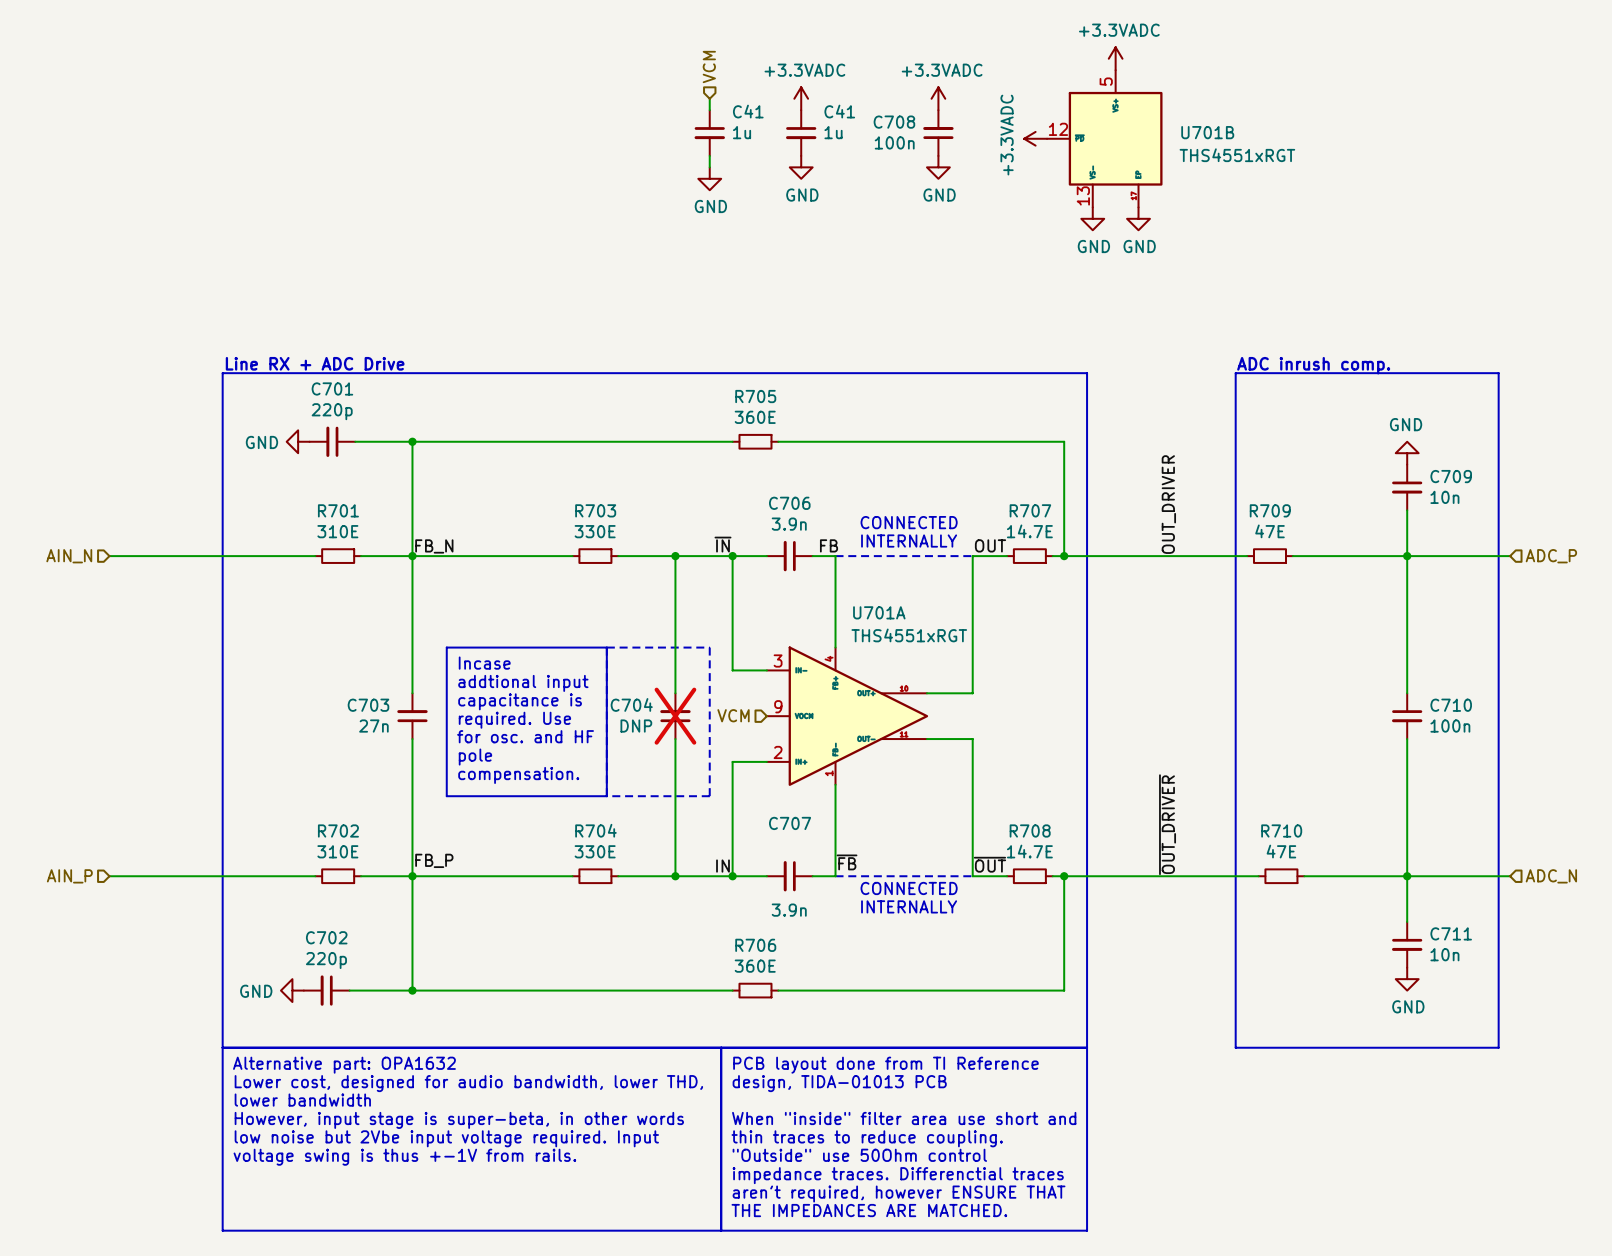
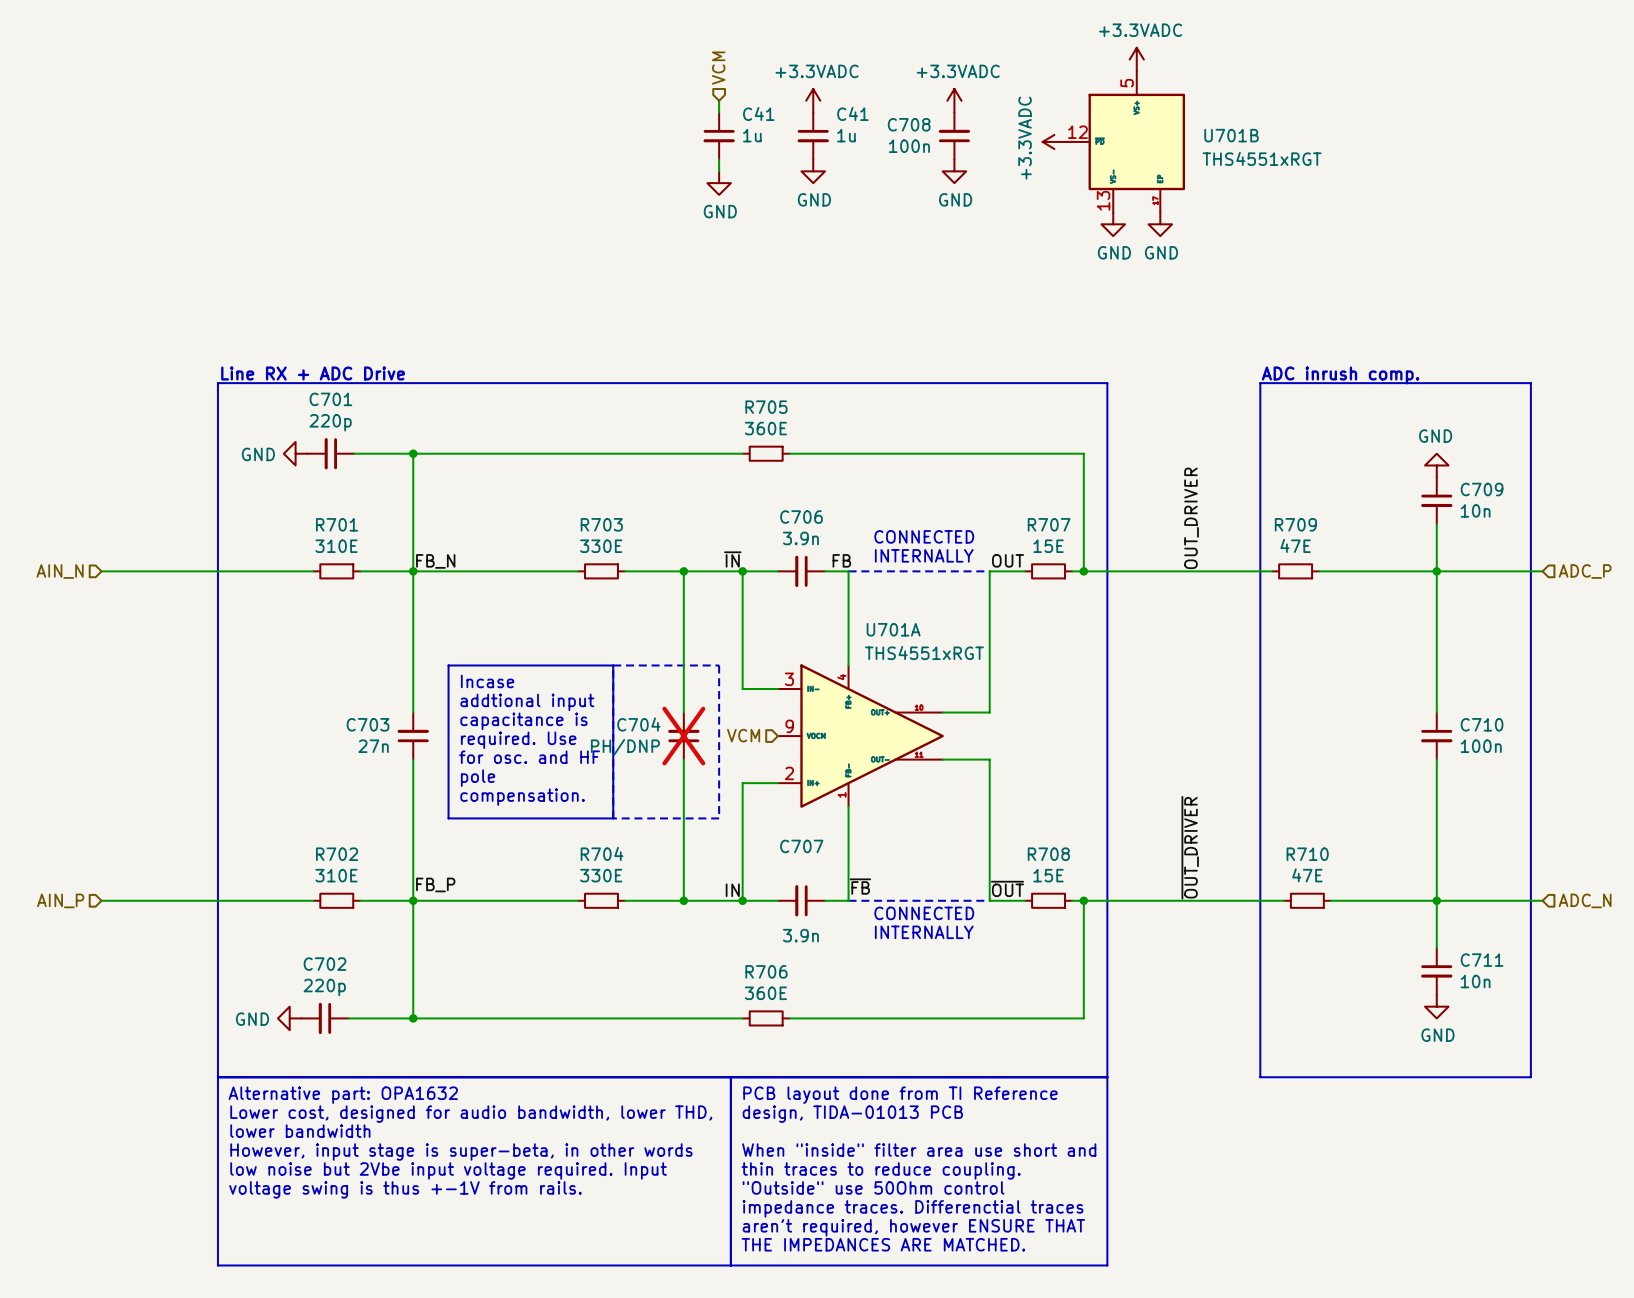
R707 value: 14.7E (1029, 531) -> 15E (1048, 546)
C704 value: DNP (636, 726) -> PH/DNP (625, 747)
R708 value: 14.7E (1029, 851) -> 15E (1048, 875)

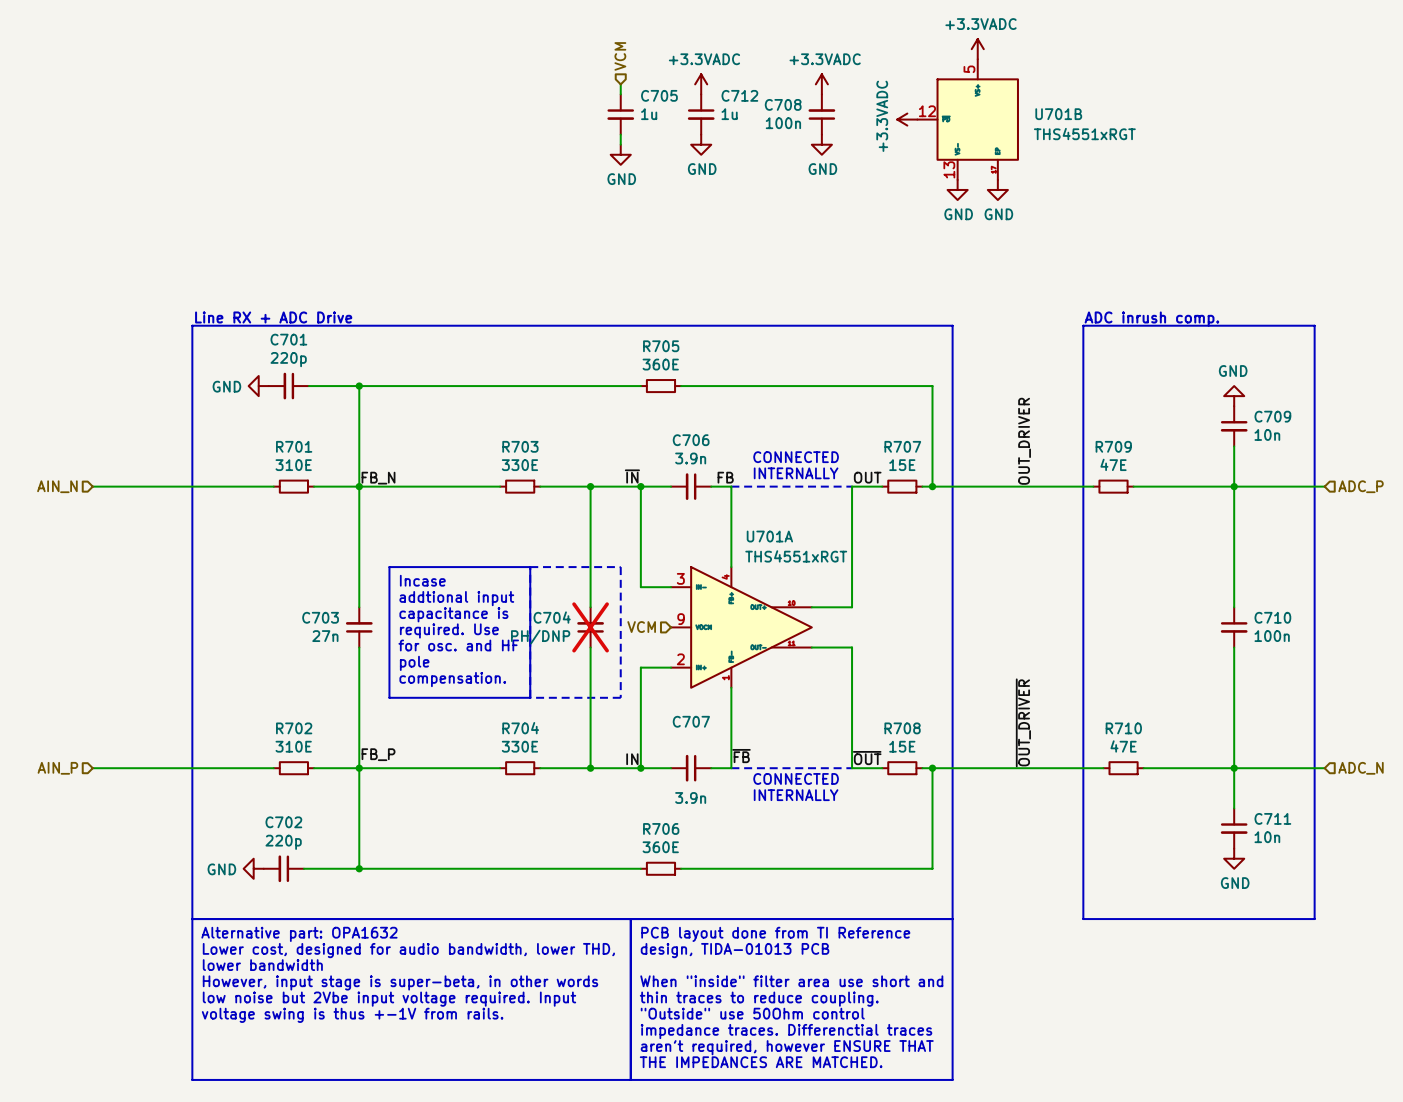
C41 name: C41 (758, 113) -> C705 (659, 95)
C41 name: C41 (852, 113) -> C712 (739, 95)

